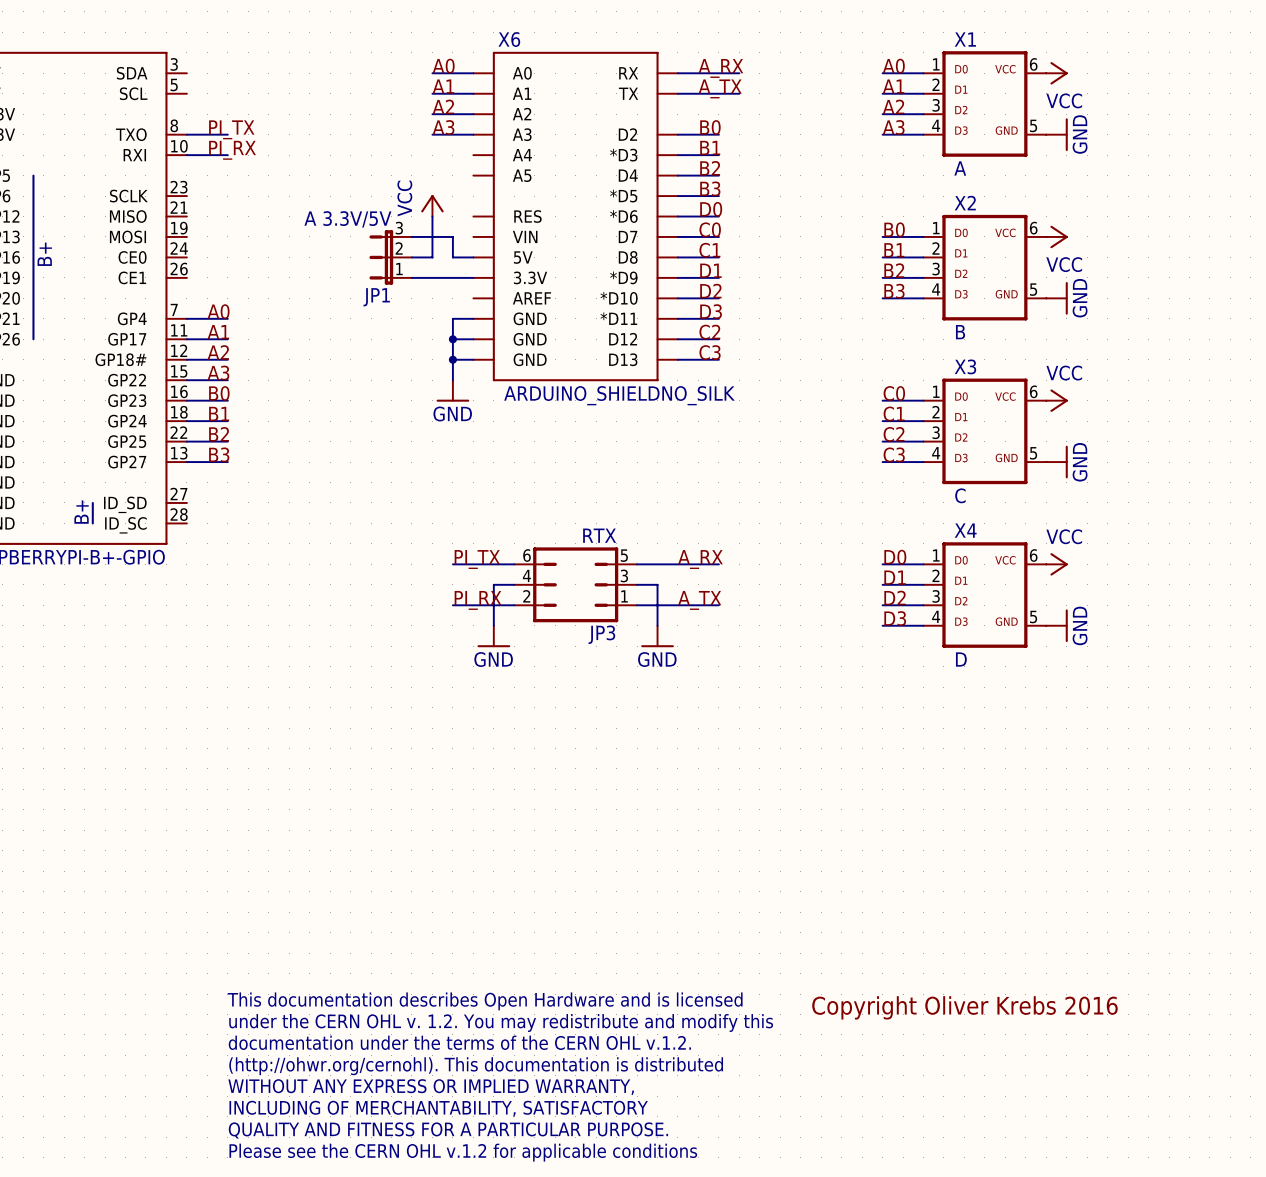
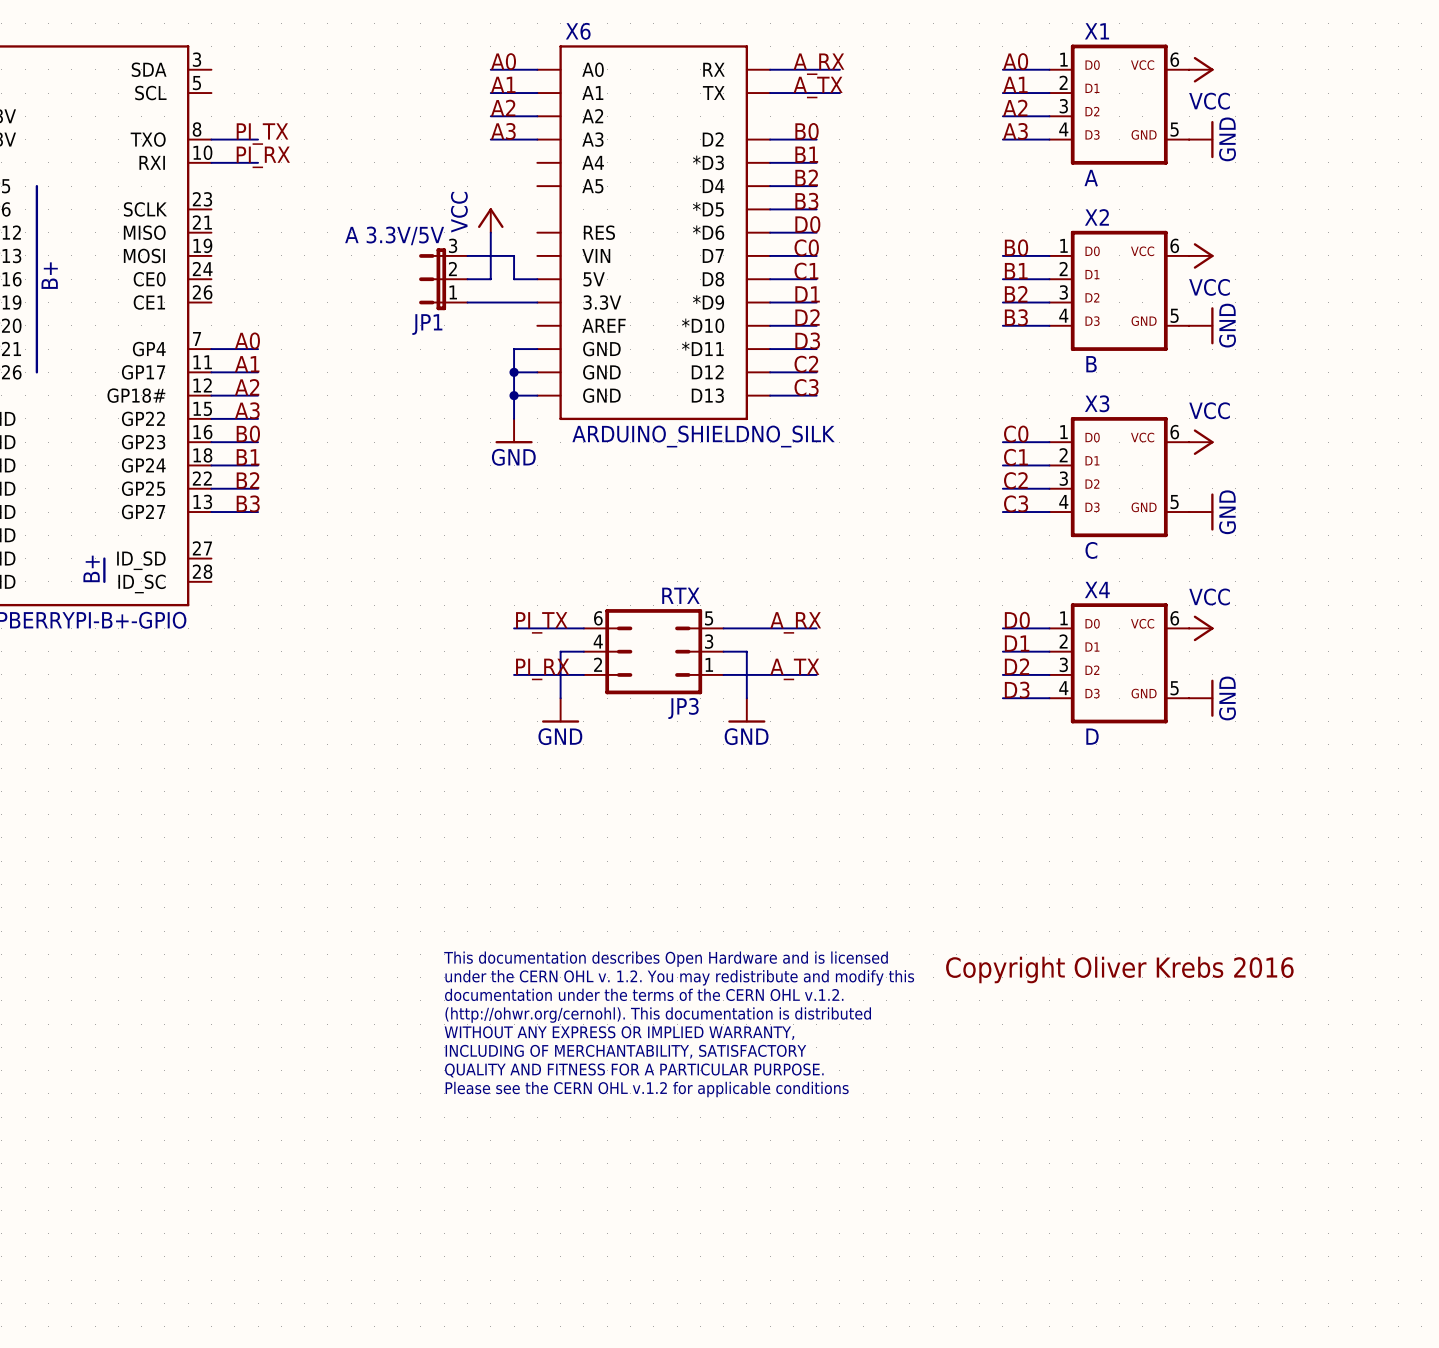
text: none -> This documentation describes Open Hardware and is licensed (666, 959)
text: none -> under the CERN OHL v. 1.2. You may redistribute and modify this (679, 977)
text: none -> documentation under the terms of the CERN OHL v.1.2. (644, 994)
text: none -> (http://ohwr.org/cernohl). This documentation is distributed (658, 1015)
text: none -> WITHOUT ANY EXPRESS OR IMPLIED WARRANTY, (619, 1033)
text: none -> INCLUDING OF MERCHANTABILITY, SATISFACTORY (625, 1051)
text: none -> QUALITY AND FITNESS FOR A PARTICULAR PURPOSE. (634, 1070)
text: none -> Please see the CERN OHL v.1.2 for applicable conditions (647, 1089)
text: This documentation describes Open Hardware and is licensed (485, 1001) -> none
text position: Copyright Oliver Krebs 2016 (964, 1007) -> Copyright Oliver Krebs 2016 (1119, 969)
text: under the CERN OHL v. 1.2. You may redistribute and modify this (501, 1022) -> none
text: documentation under the terms of the CERN OHL v.1.2. (459, 1042) -> none
text: (http://ohwr.org/cernohl). This documentation is distributed (476, 1066) -> none
text: WITHOUT ANY EXPRESS OR IMPLIED WARRANTY, (431, 1087) -> none
text: INCLUDING OF MERCHANTABILITY, SATISFACTORY (438, 1108) -> none
text: QUALITY AND FITNESS FOR A PARTICULAR PURPOSE. (448, 1130) -> none
text: Please see the CERN OHL v.1.2 for applicable conditions (463, 1152) -> none

